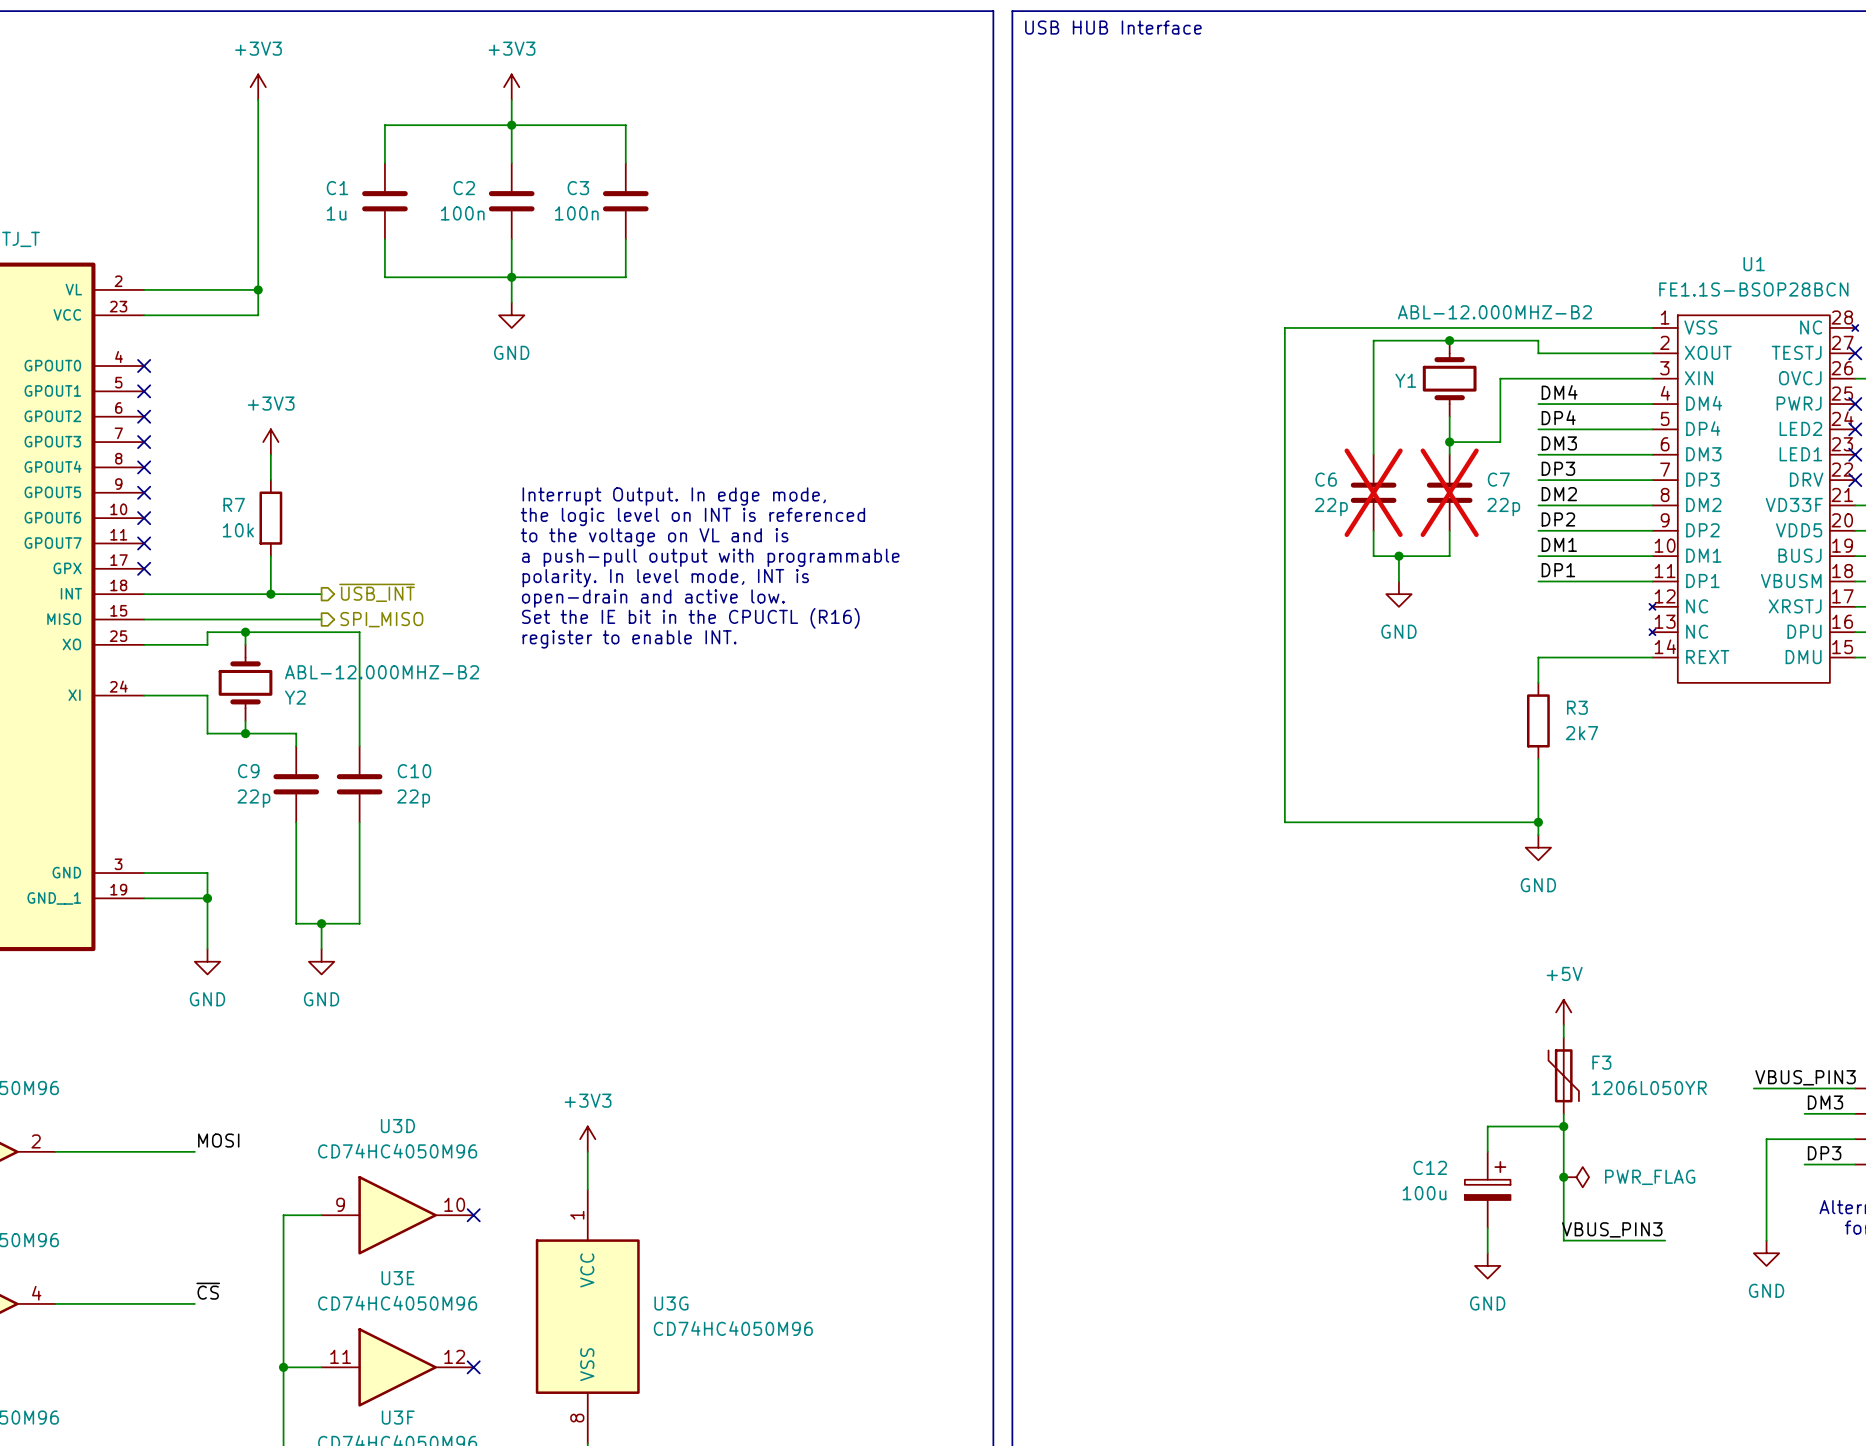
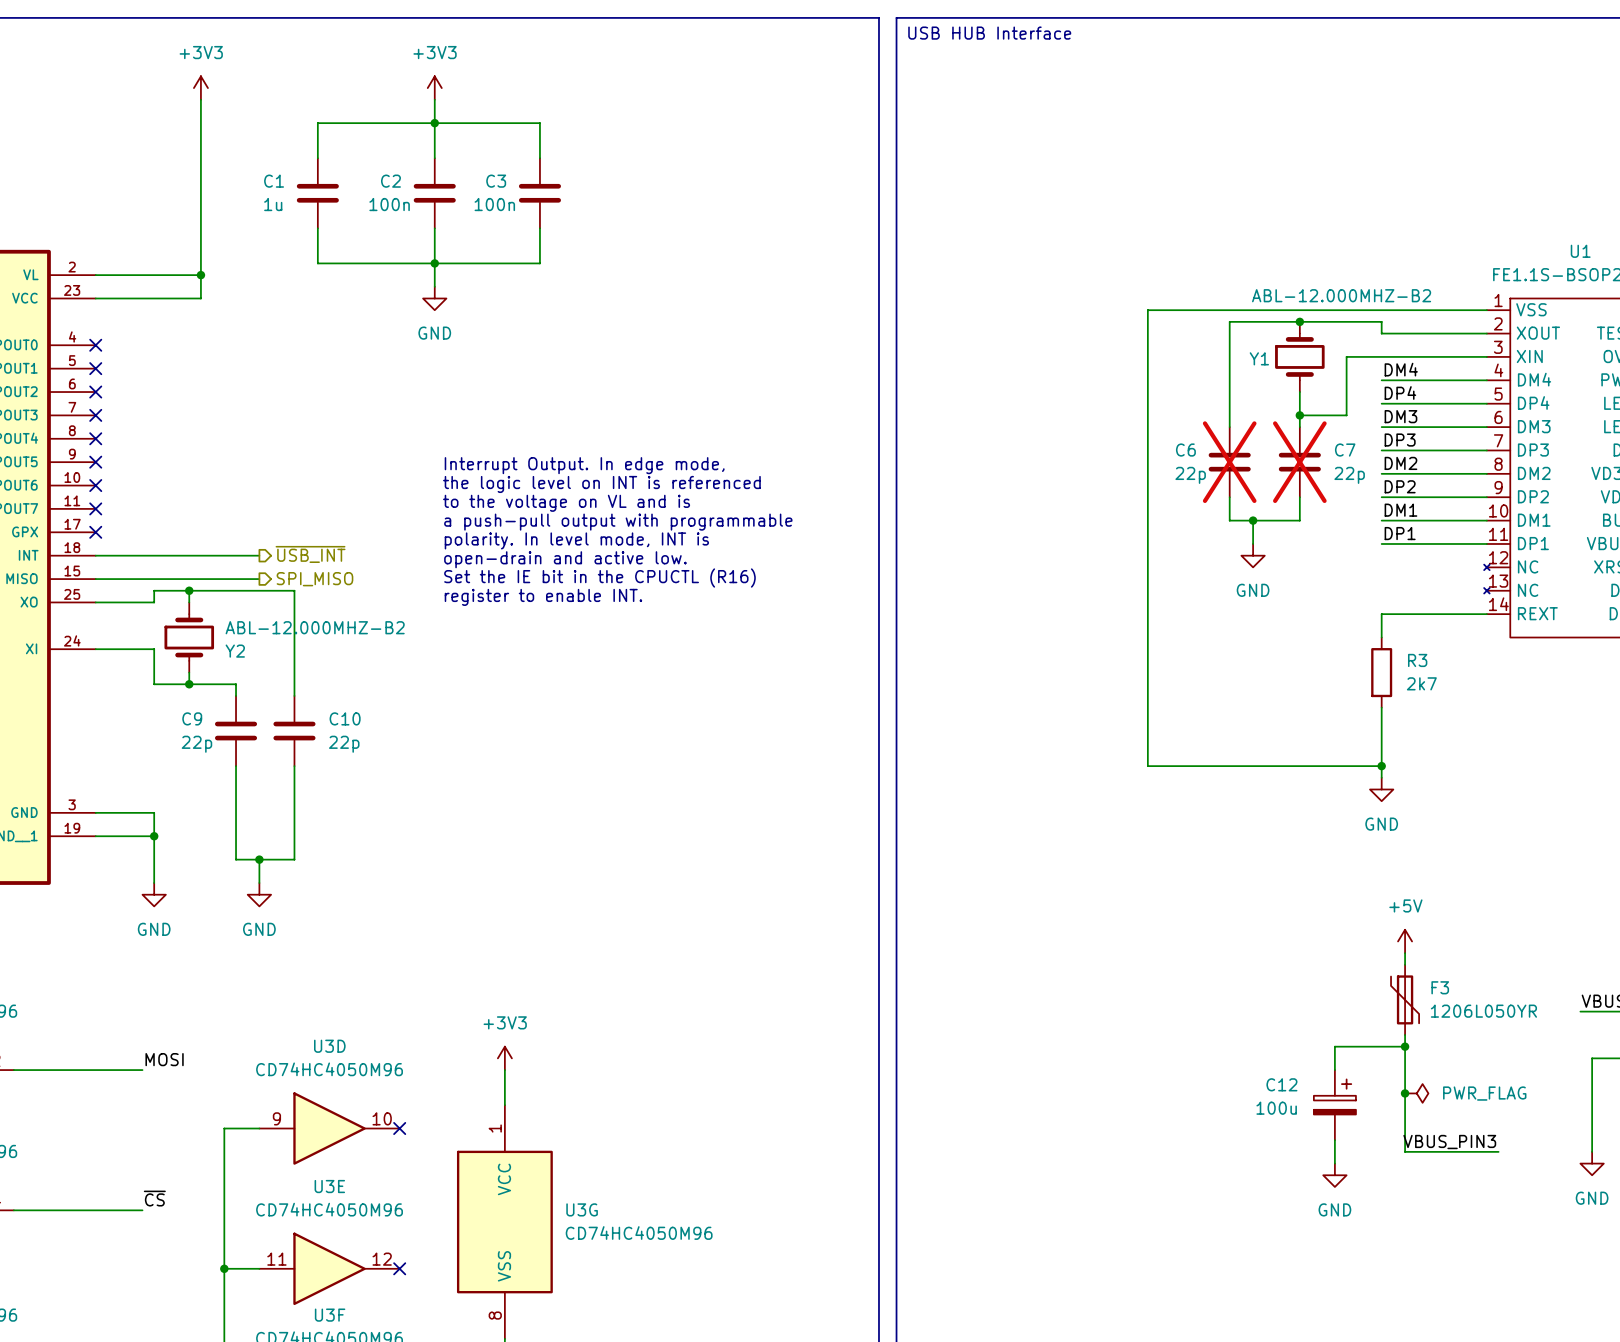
power symbol: +3V3 (270, 442) -> none
wire: (270, 454) (270, 480) -> none
R7: 10k (270, 518) -> none
wire: (270, 556) (270, 594) -> none
junction: (270, 594) -> none

